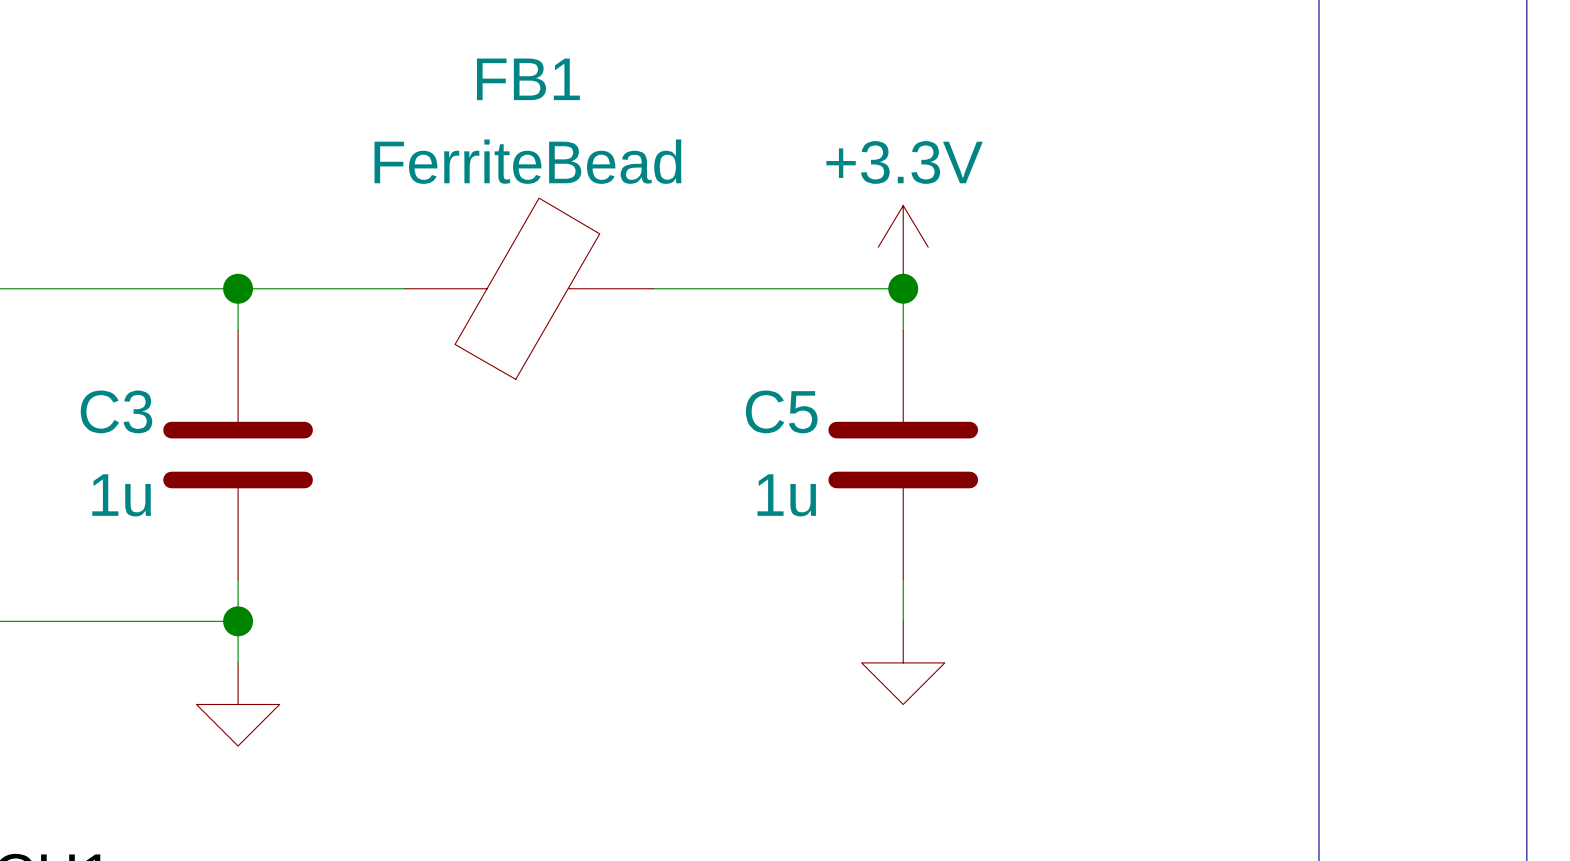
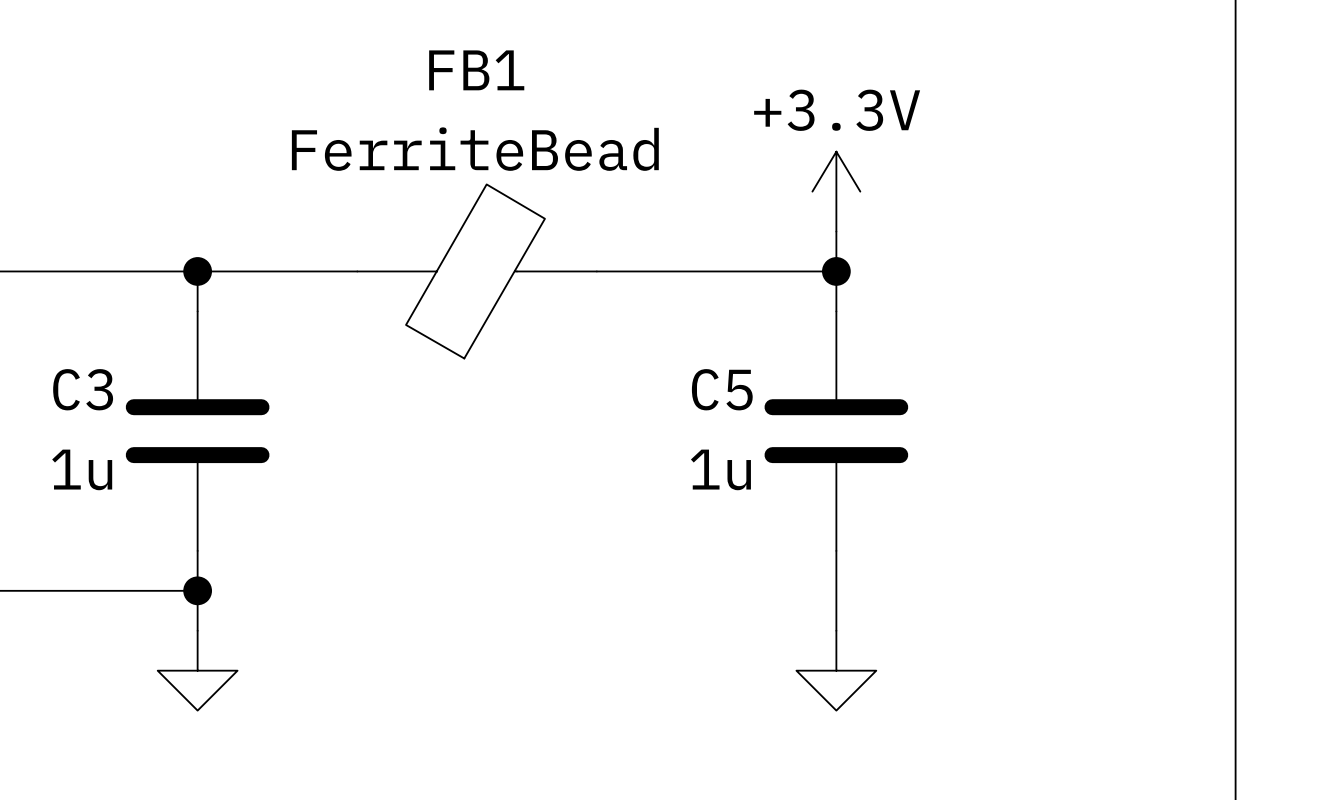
power symbol position: +3.3V (903, 247) -> +3.3V (836, 191)
power symbol position: (903, 662) -> (836, 670)

